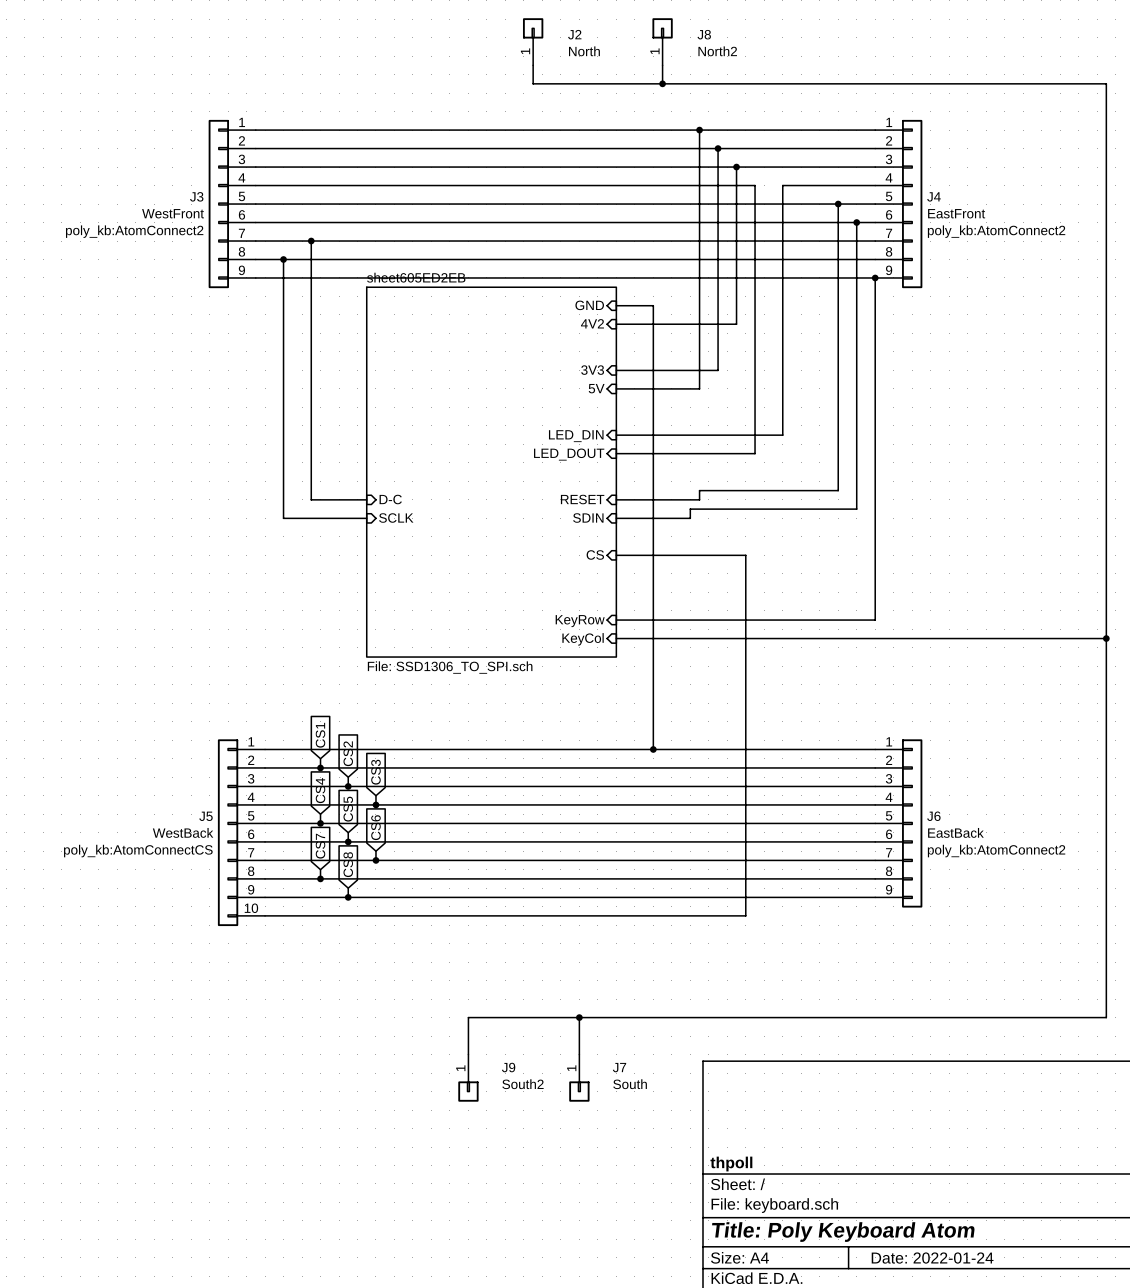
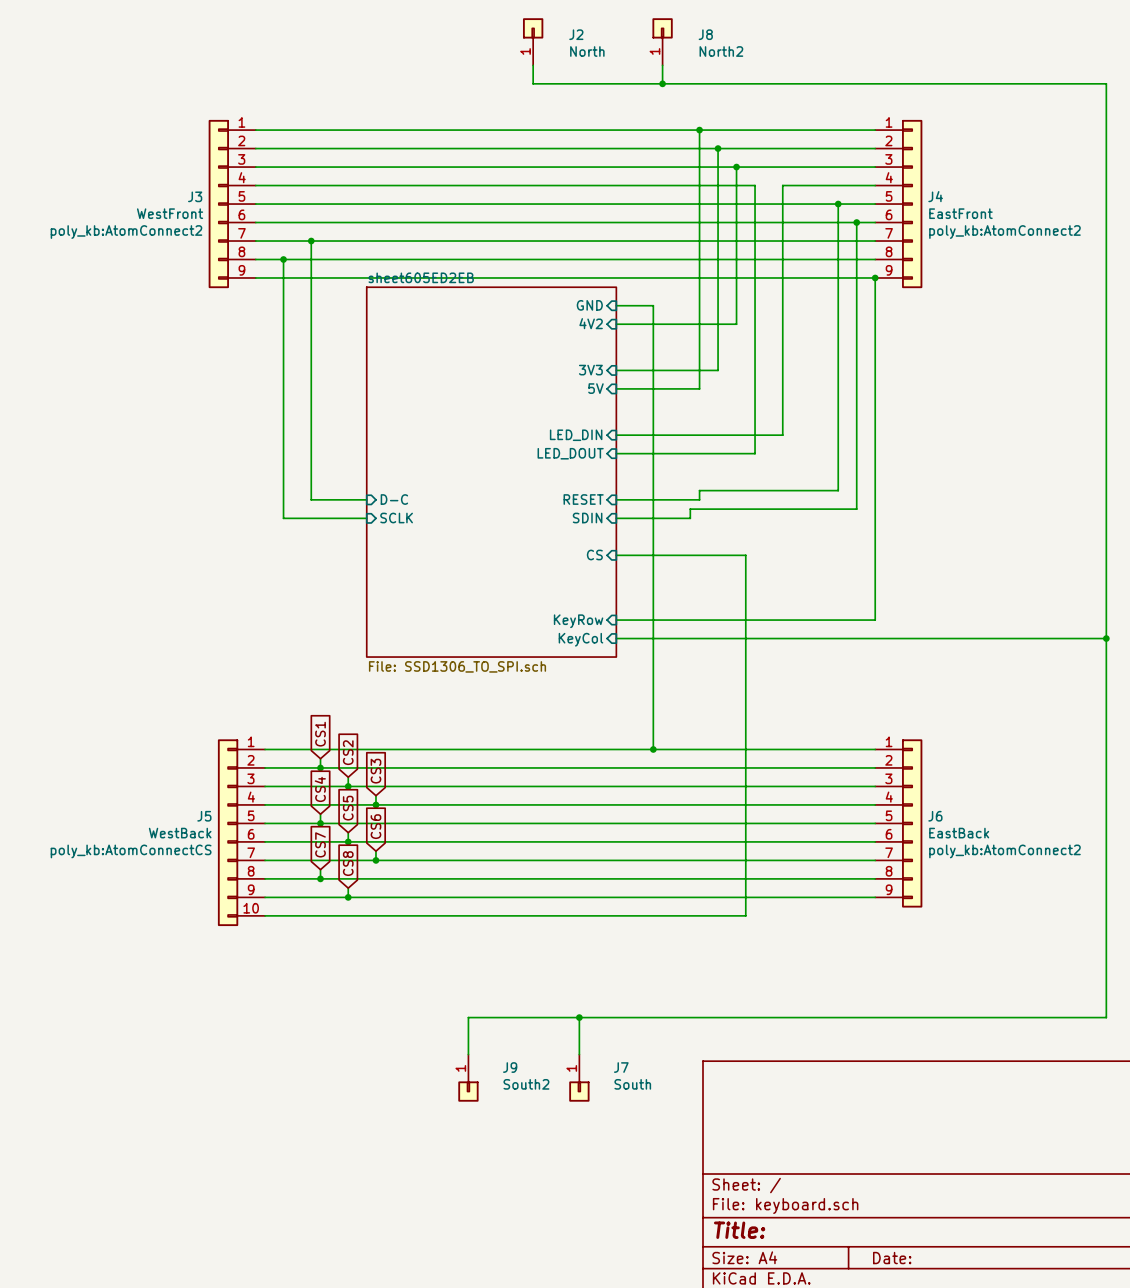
title block: thpoll (731, 1164) -> none
title block: Title: Poly Keyboard Atom (843, 1232) -> Title: (739, 1230)
title block: Date: 2022-01-24 (932, 1258) -> Date: (892, 1258)

